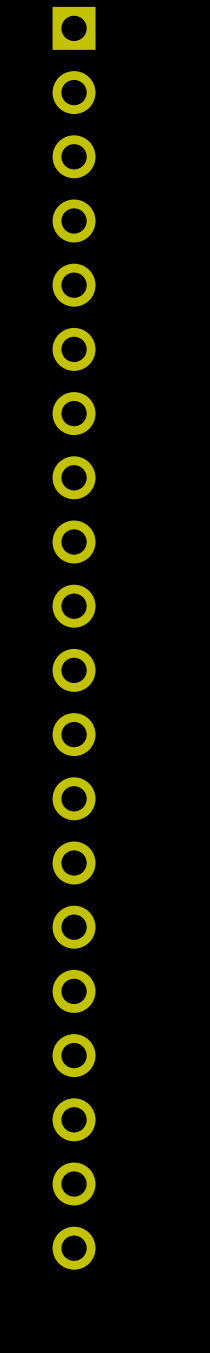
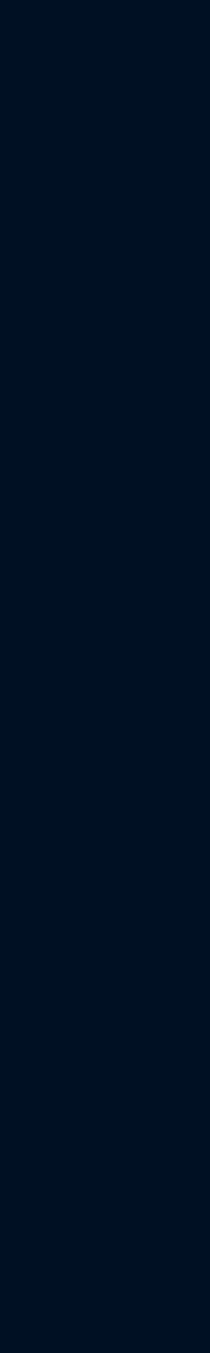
part: (74, 638) -> none

